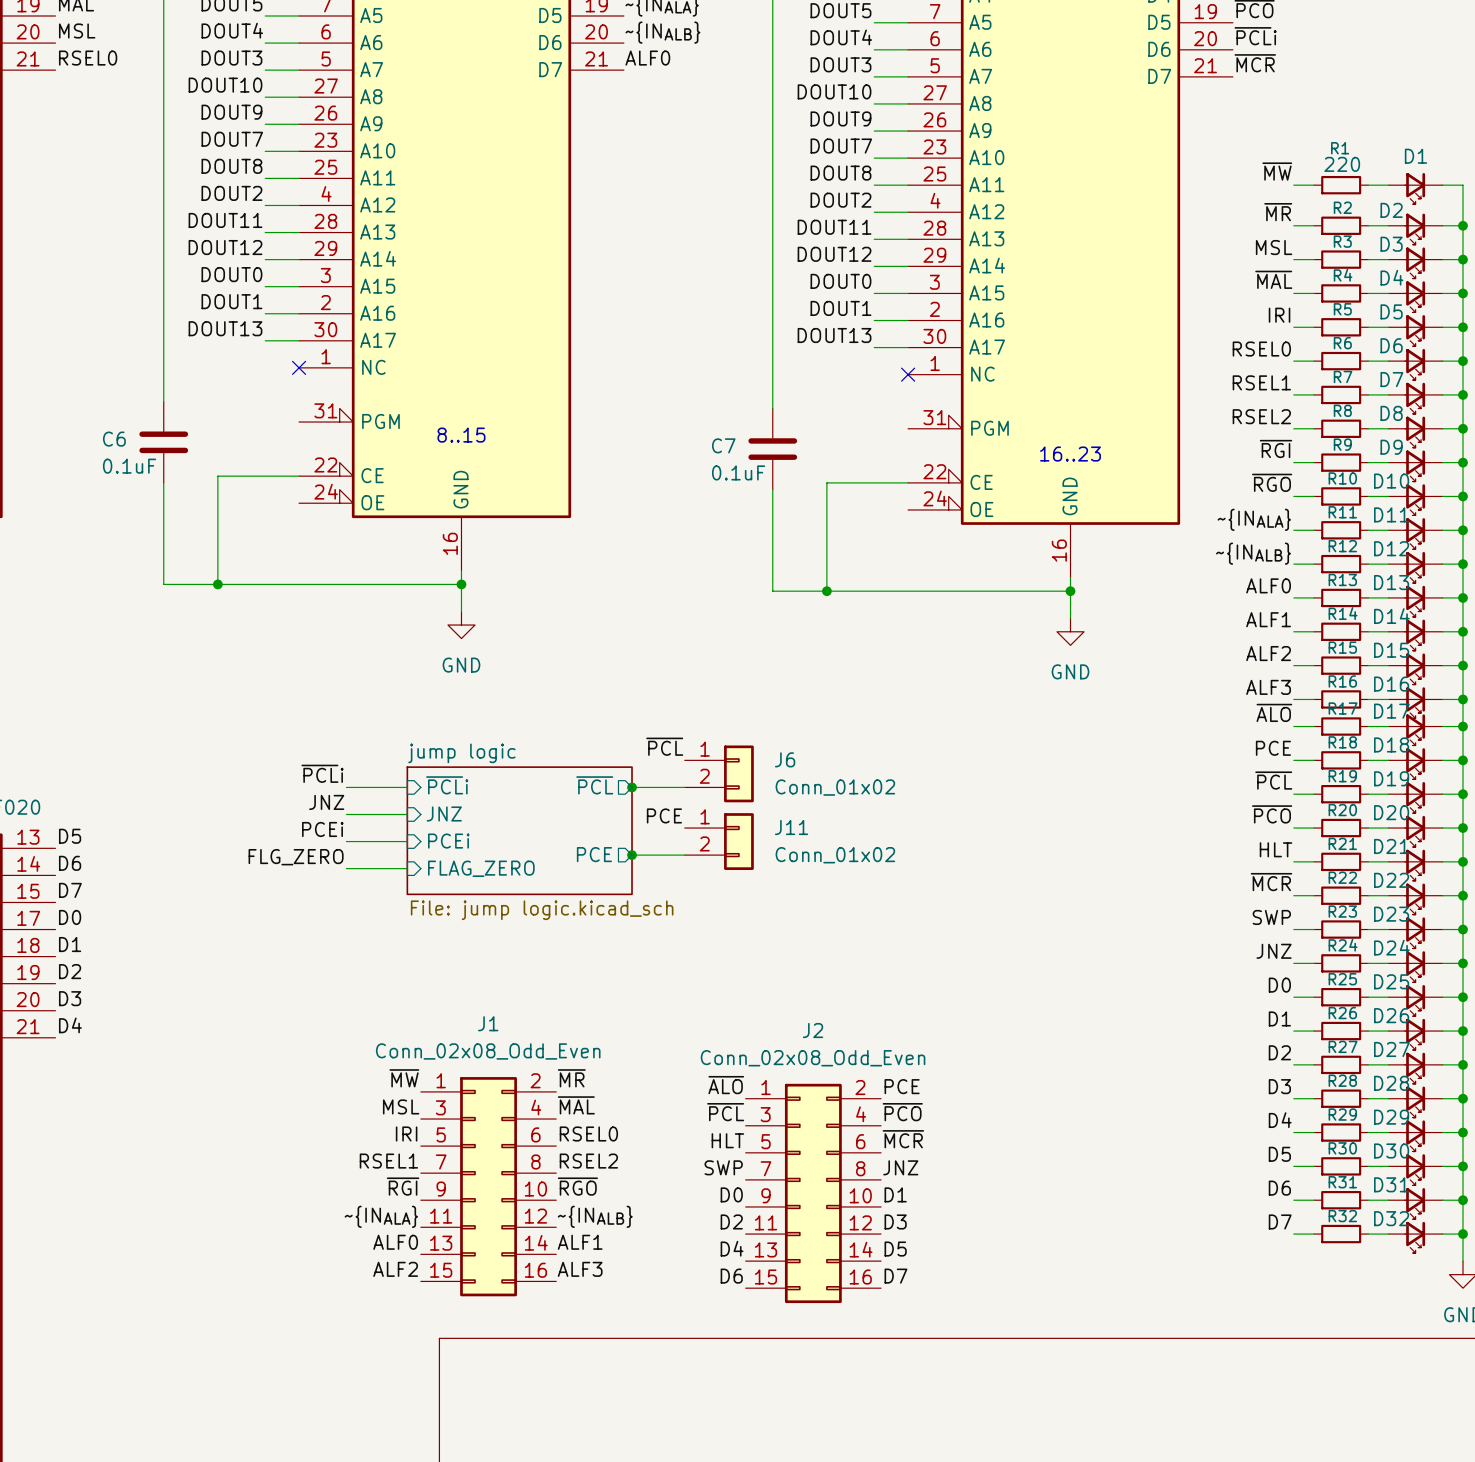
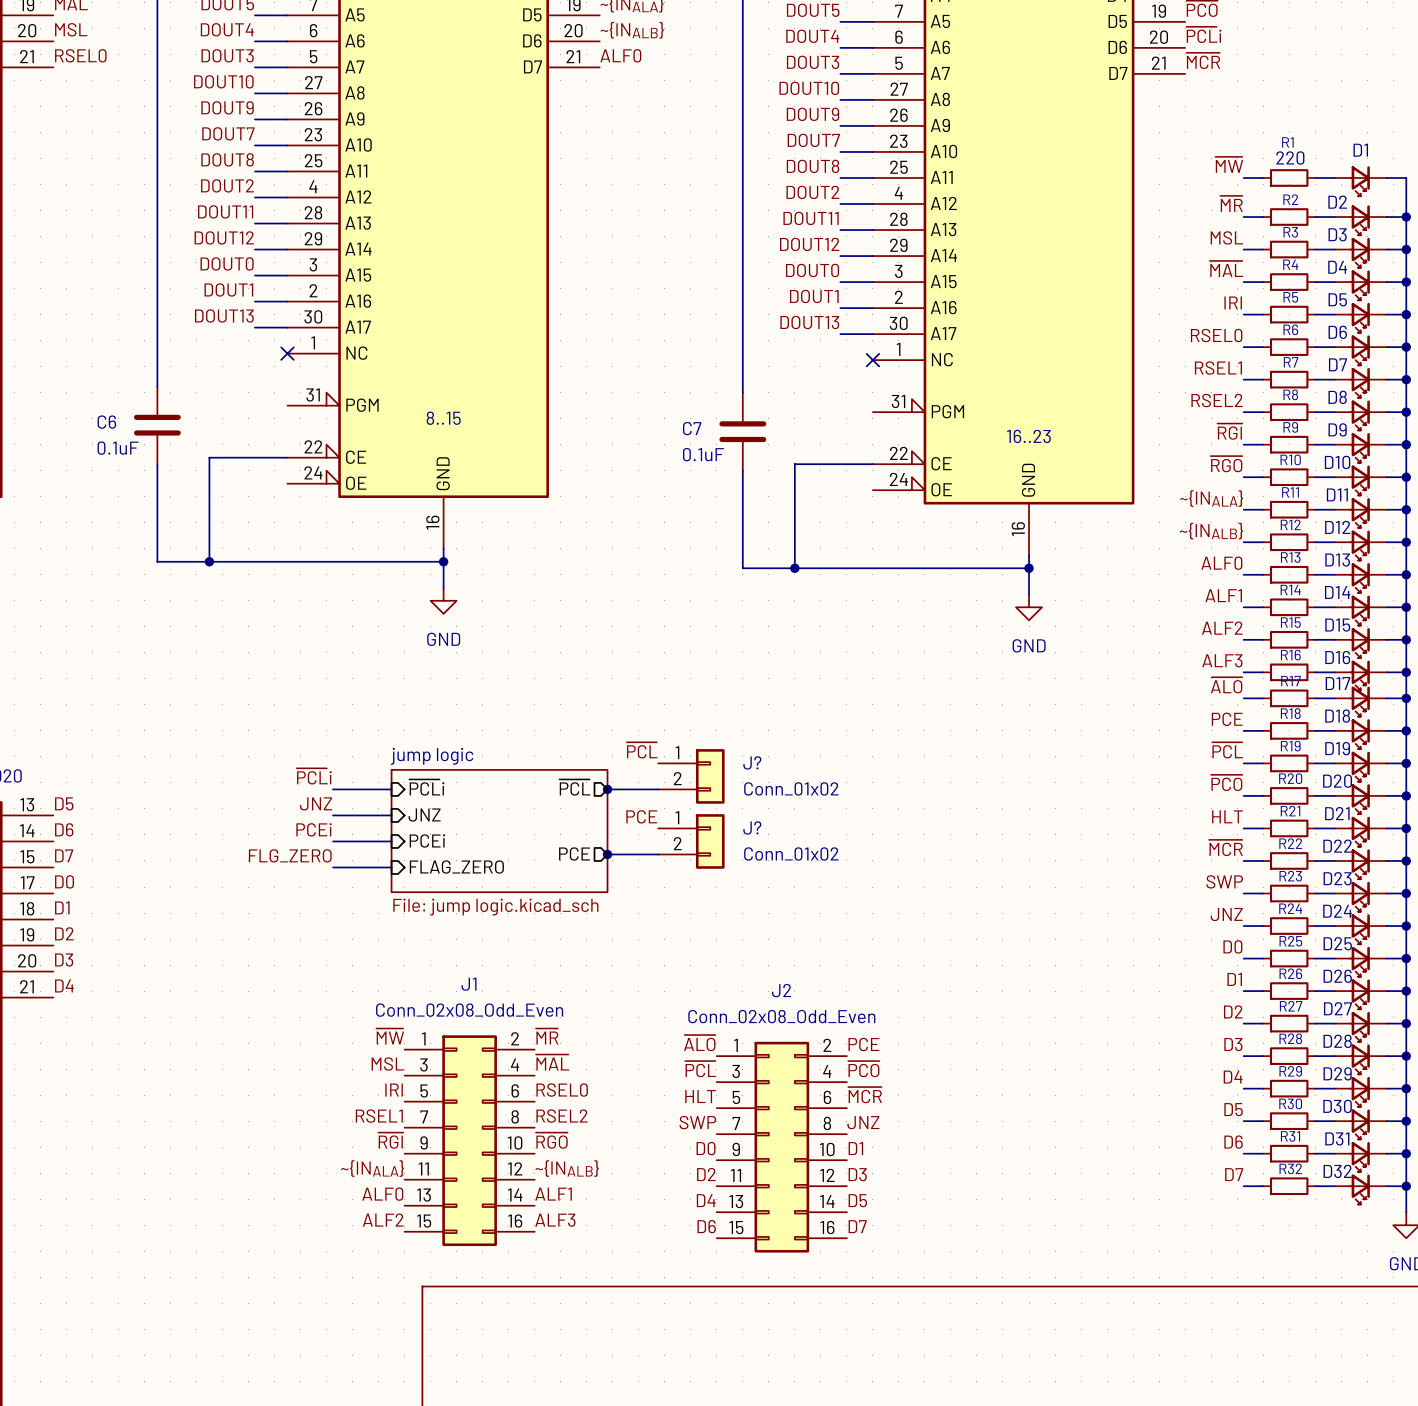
label position: ~{PCL} (664, 746) -> ~{PCL} (642, 750)
label position: ~{PCL}i (322, 773) -> ~{PCL}i (314, 776)
J6: Conn_01x02 (719, 773) -> none
sheet pin position: ~{PCL}i (447, 785) -> ~{PCL}i (426, 787)
sheet pin position: ~{PCL} (594, 785) -> ~{PCL} (574, 787)
wire: (346, 787) (407, 787) -> (333, 789) (391, 789)
wire: (630, 787) (684, 787) -> (606, 789) (658, 789)
junction: (632, 787) -> none
label position: JNZ (326, 802) -> JNZ (316, 803)
J?: none -> Conn_01x02 (691, 776)
sheet pin position: JNZ (444, 813) -> JNZ (424, 815)
wire: (346, 814) (407, 814) -> (333, 815) (391, 815)
label position: PCE (664, 815) -> PCE (641, 816)
junction: none -> (607, 789)
label position: PCEi (322, 829) -> PCEi (314, 829)
sheet jump logic position: (519, 830) -> (499, 831)
wire: (346, 841) (407, 841) -> (333, 841) (391, 841)
sheet pin position: PCEi (448, 841) -> PCEi (427, 840)
J11: Conn_01x02 (719, 841) -> none
sheet pin position: PCE (594, 854) -> PCE (574, 854)
wire: (630, 855) (684, 855) -> (606, 854) (658, 854)
junction: (632, 855) -> none
label position: FLG_ZERO (296, 857) -> FLG_ZERO (290, 855)
wire: (346, 868) (407, 868) -> (333, 867) (391, 867)
sheet pin position: FLAG_ZERO (481, 868) -> FLAG_ZERO (456, 867)
J?: none -> Conn_01x02 (691, 841)
junction: none -> (607, 854)

